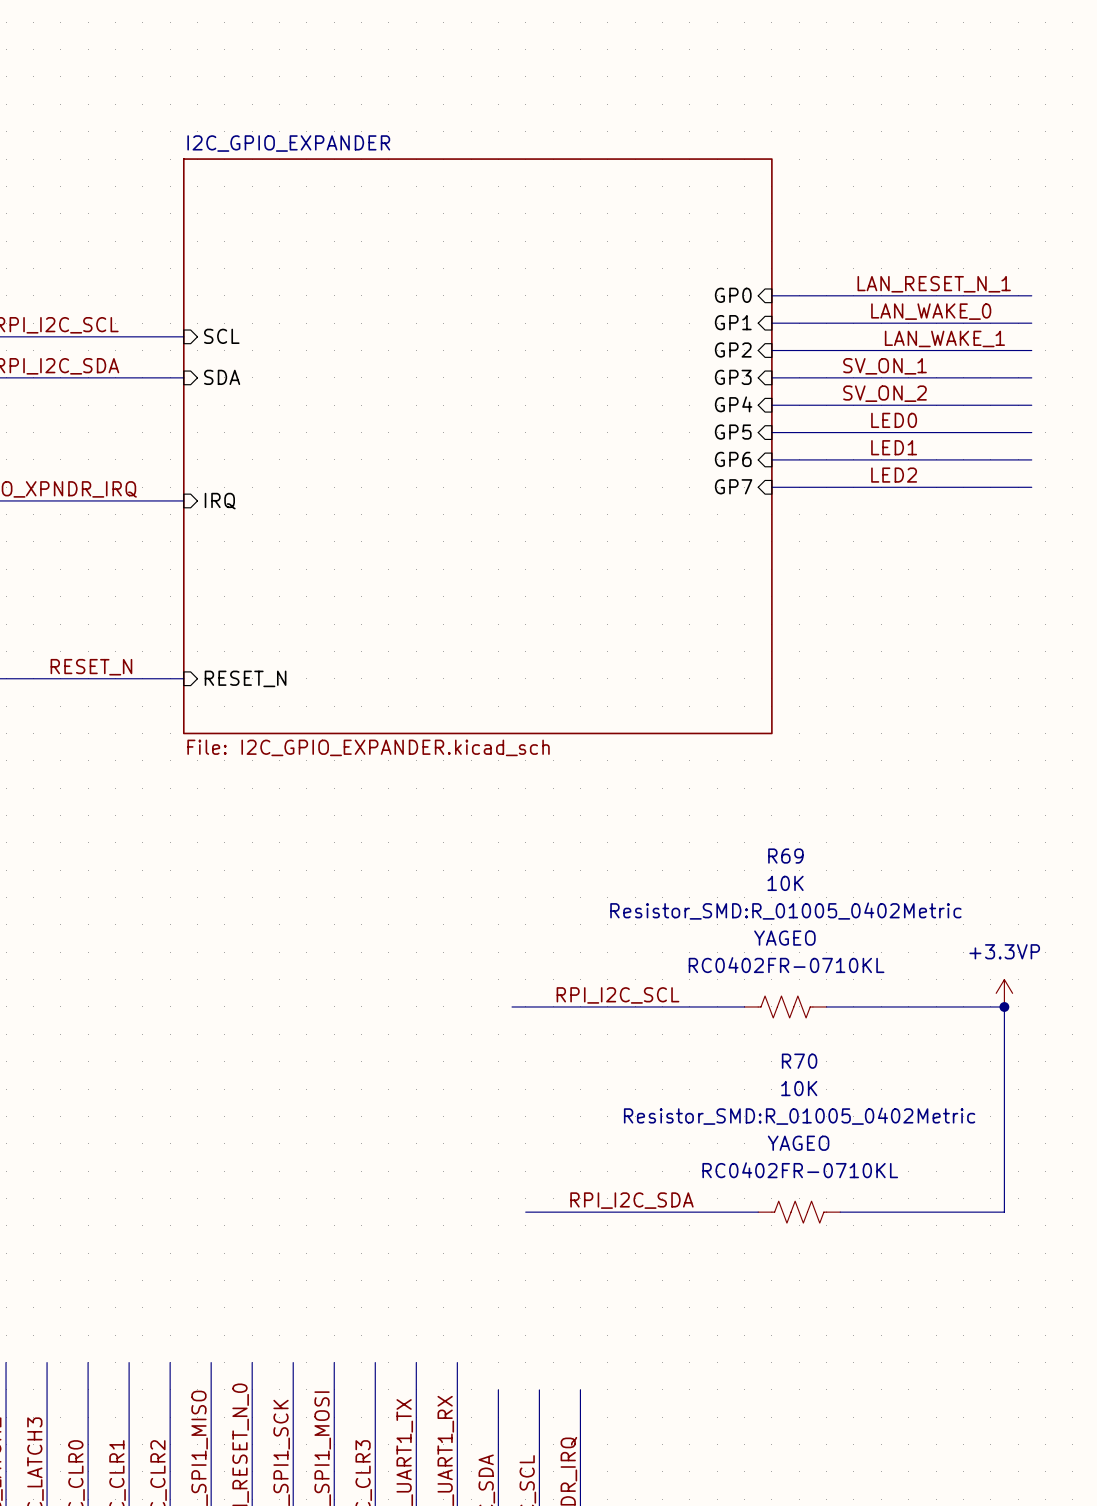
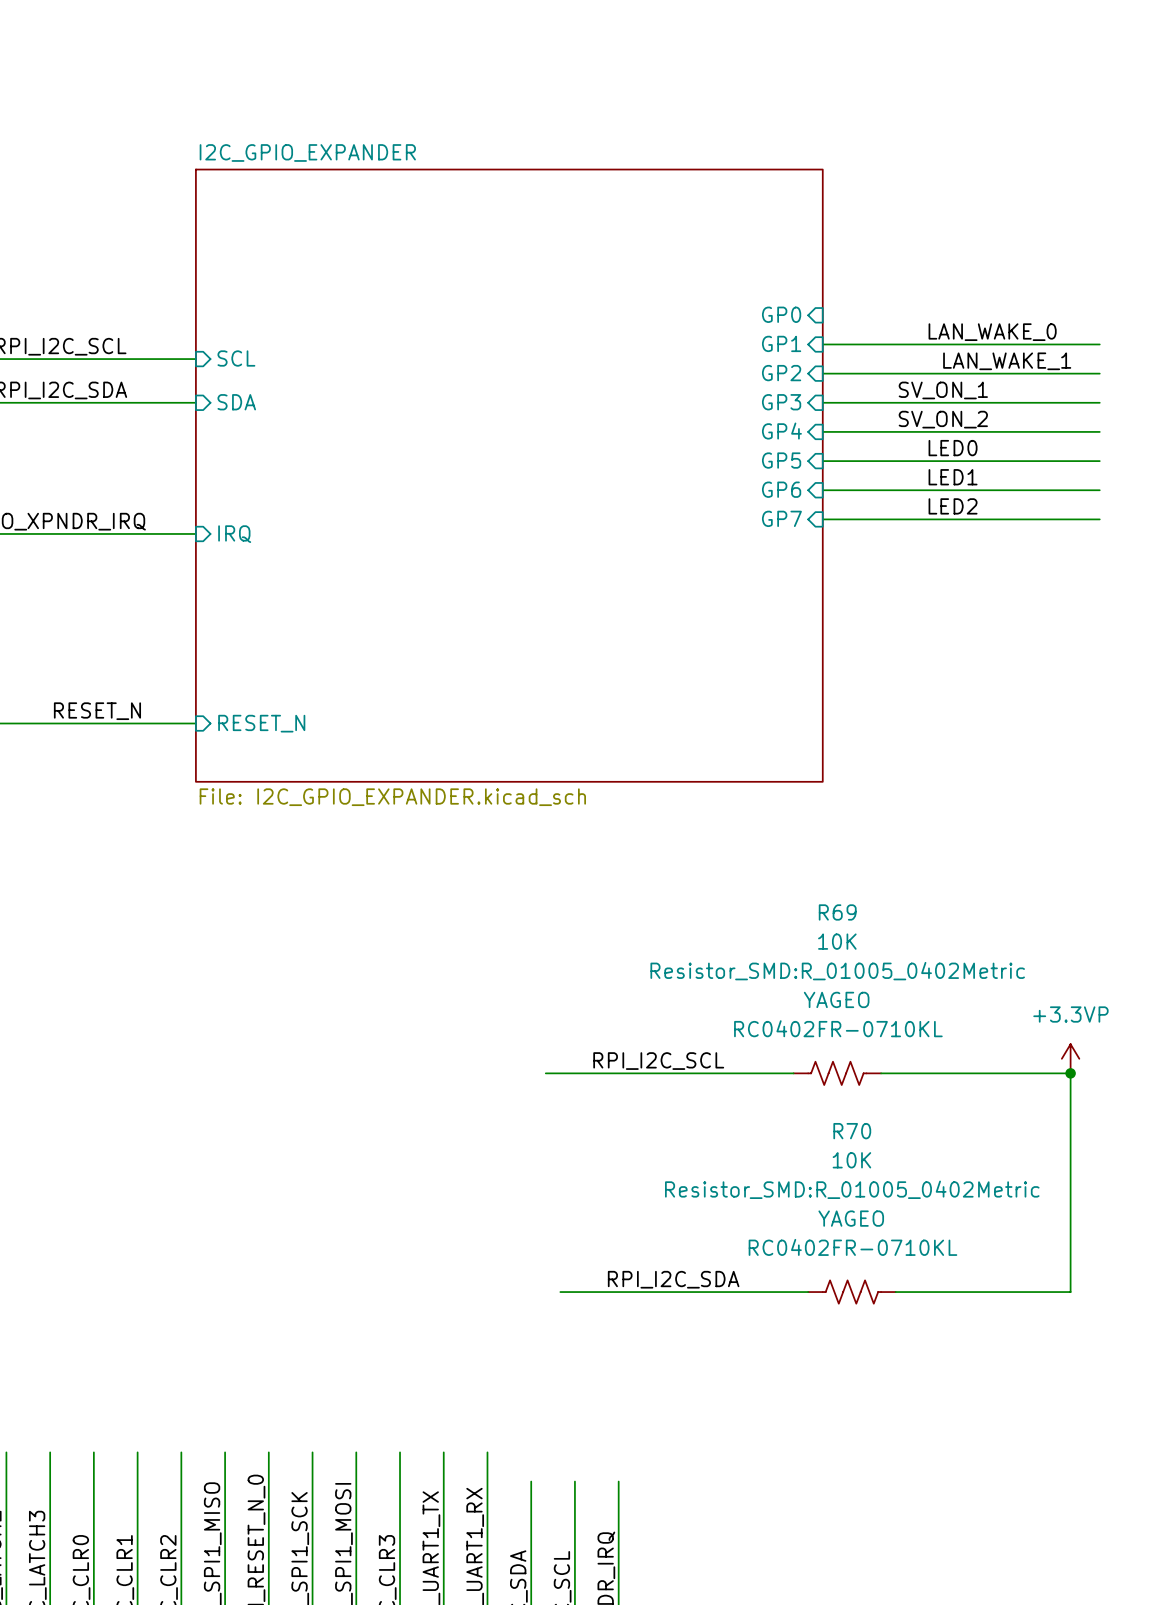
label: LAN_RESET_N_1 (934, 284) -> none
wire: (771, 295) (1031, 295) -> none

